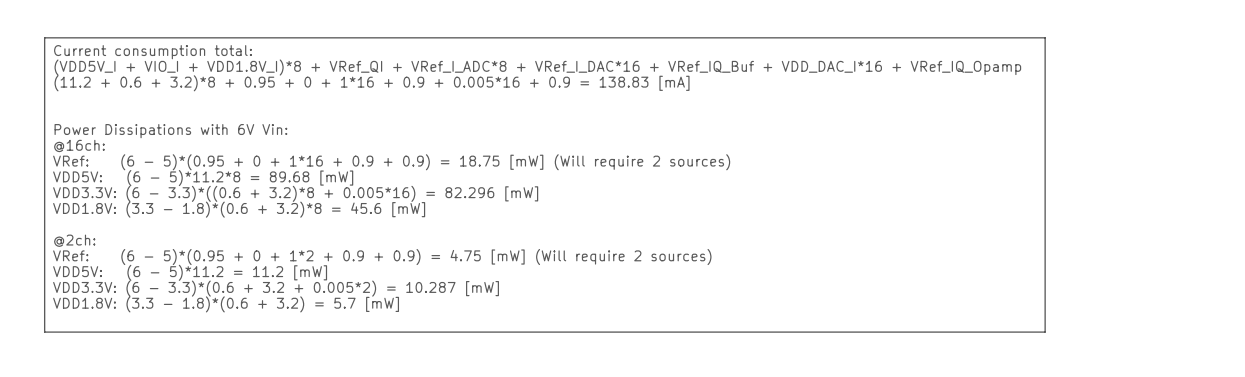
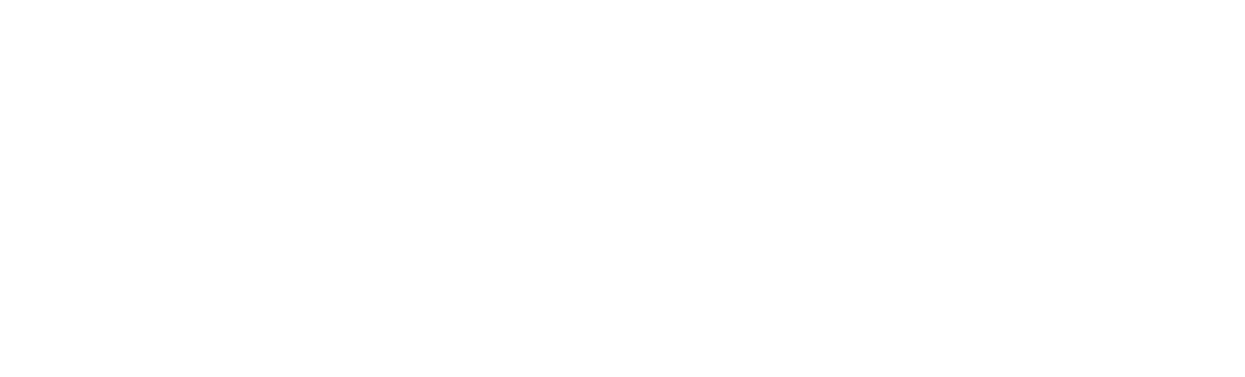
line: (44, 37) (1045, 37) (1045, 332) (44, 332) (44, 37) -> none
text: Current consumption total: (152, 52) -> none
text: (VDD5V_I + VIO_I + VDD1.8V_I)*8 + VRef_QI + VRef_I_ADC*8 + VRef_I_DAC*16 + VRef_IQ_Buf + VDD_DAC_I*16 + VRef_IQ_Opamp (537, 67) -> none
text: (11.2 + 0.6 + 3.2)*8 + 0.95 + 0 + 1*16 + 0.9 + 0.005*16 + 0.9 = 138.83 [mA] (372, 83) -> none
text: Power Dissipations with 6V Vin: (170, 131) -> none
text: @16ch: (79, 146) -> none
text: VRef: (6 - 5)*(0.95 + 0 + 1*16 + 0.9 + 0.9) = 18.75 [mW] (Will require 2 sources) (391, 162) -> none
text: VDD5V: (6 - 5)*11.2*8 = 89.68 [mW] (203, 178) -> none
text: VDD3.3V: (6 - 3.3)*((0.6 + 3.2)*8 + 0.005*16) = 82.296 [mW] (295, 193) -> none
text: VDD1.8V: (3.3 - 1.8)*(0.6 + 3.2)*8 = 45.6 [mW] (239, 209) -> none
text: @2ch: (74, 240) -> none
text: VRef: (6 - 5)*(0.95 + 0 + 1*2 + 0.9 + 0.9) = 4.75 [mW] (Will require 2 sources) (382, 257) -> none
text: VDD5V: (6 - 5)*11.2 = 11.2 [mW] (190, 272) -> none
text: VDD3.3V: (6 - 3.3)*(0.6 + 3.2 + 0.005*2) = 10.287 [mW] (276, 288) -> none
text: VDD1.8V: (3.3 - 1.8)*(0.6 + 3.2) = 5.7 [mW] (226, 304) -> none

